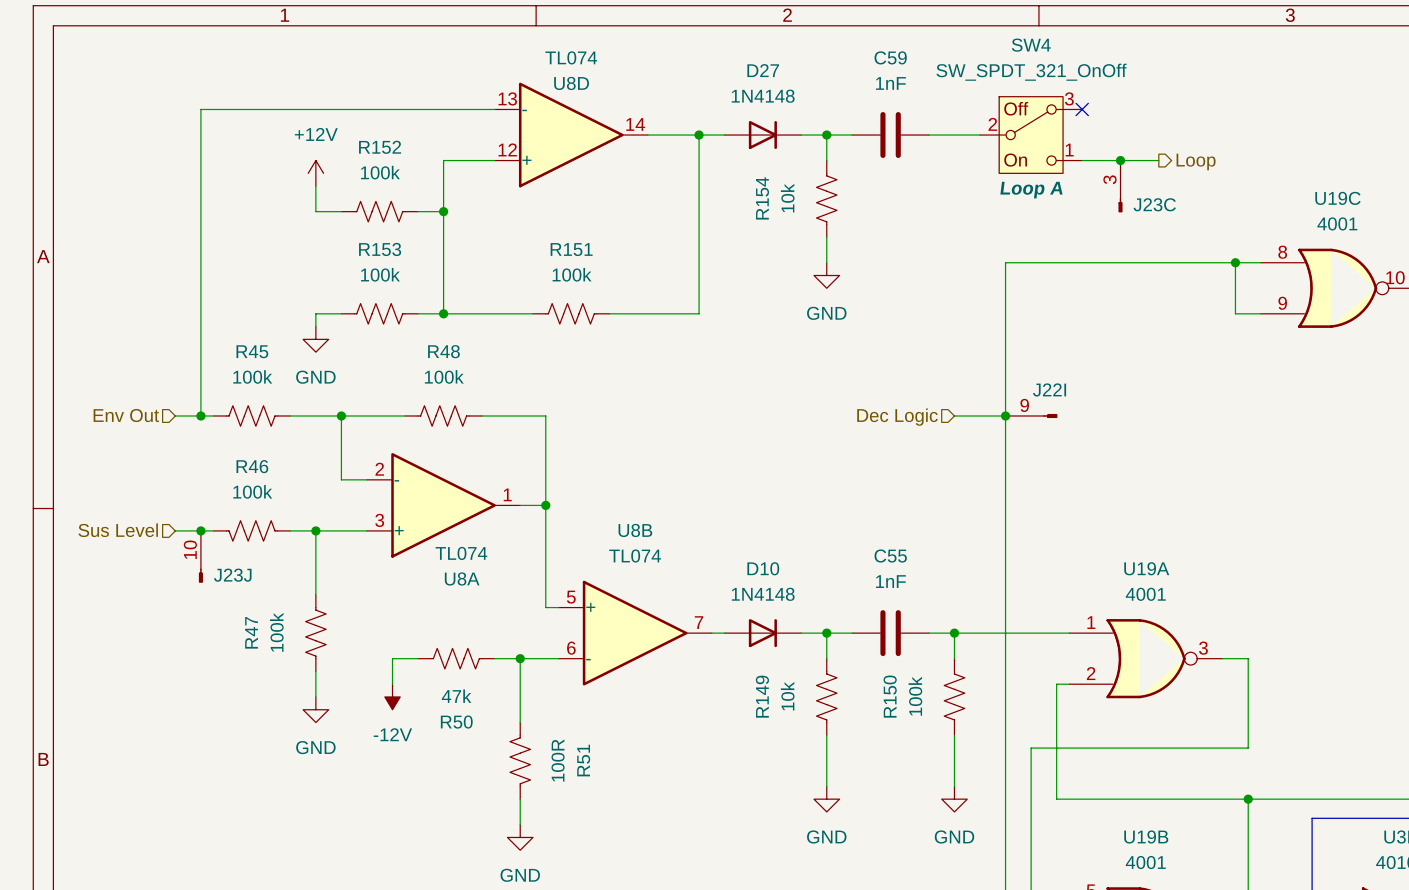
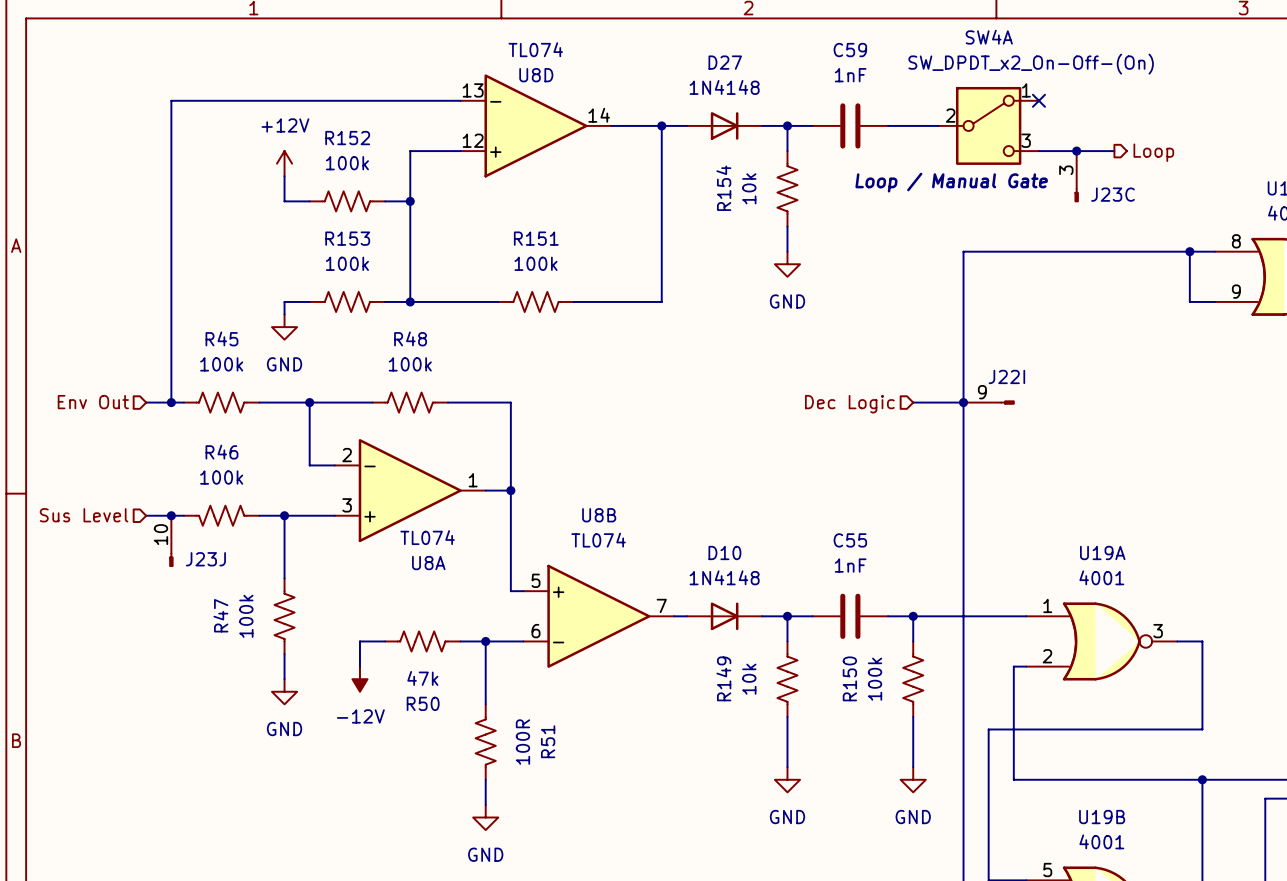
SW4: SW_SPDT_321_OnOff (1031, 135) -> none
SW4A: none -> SW_DPDT_x2_On-Off-(On) (988, 125)

